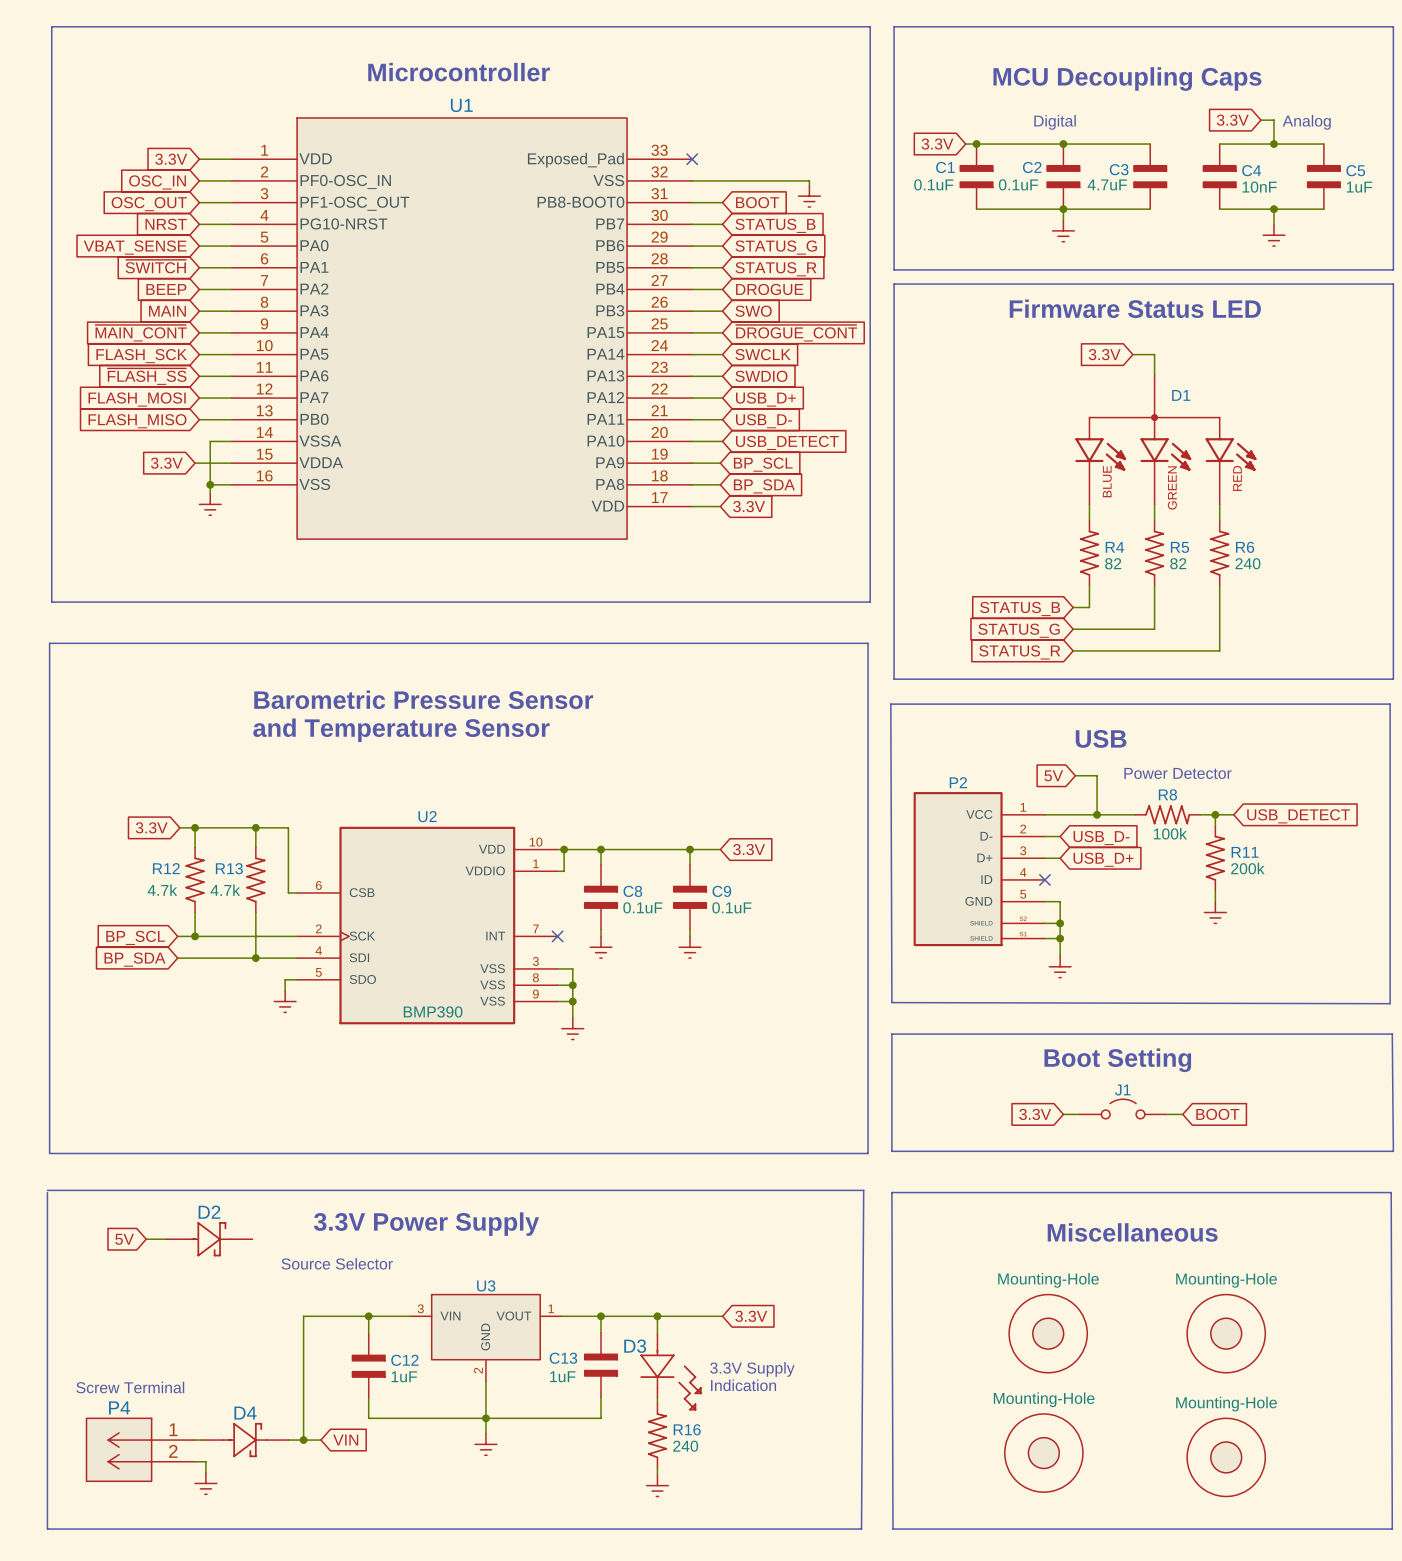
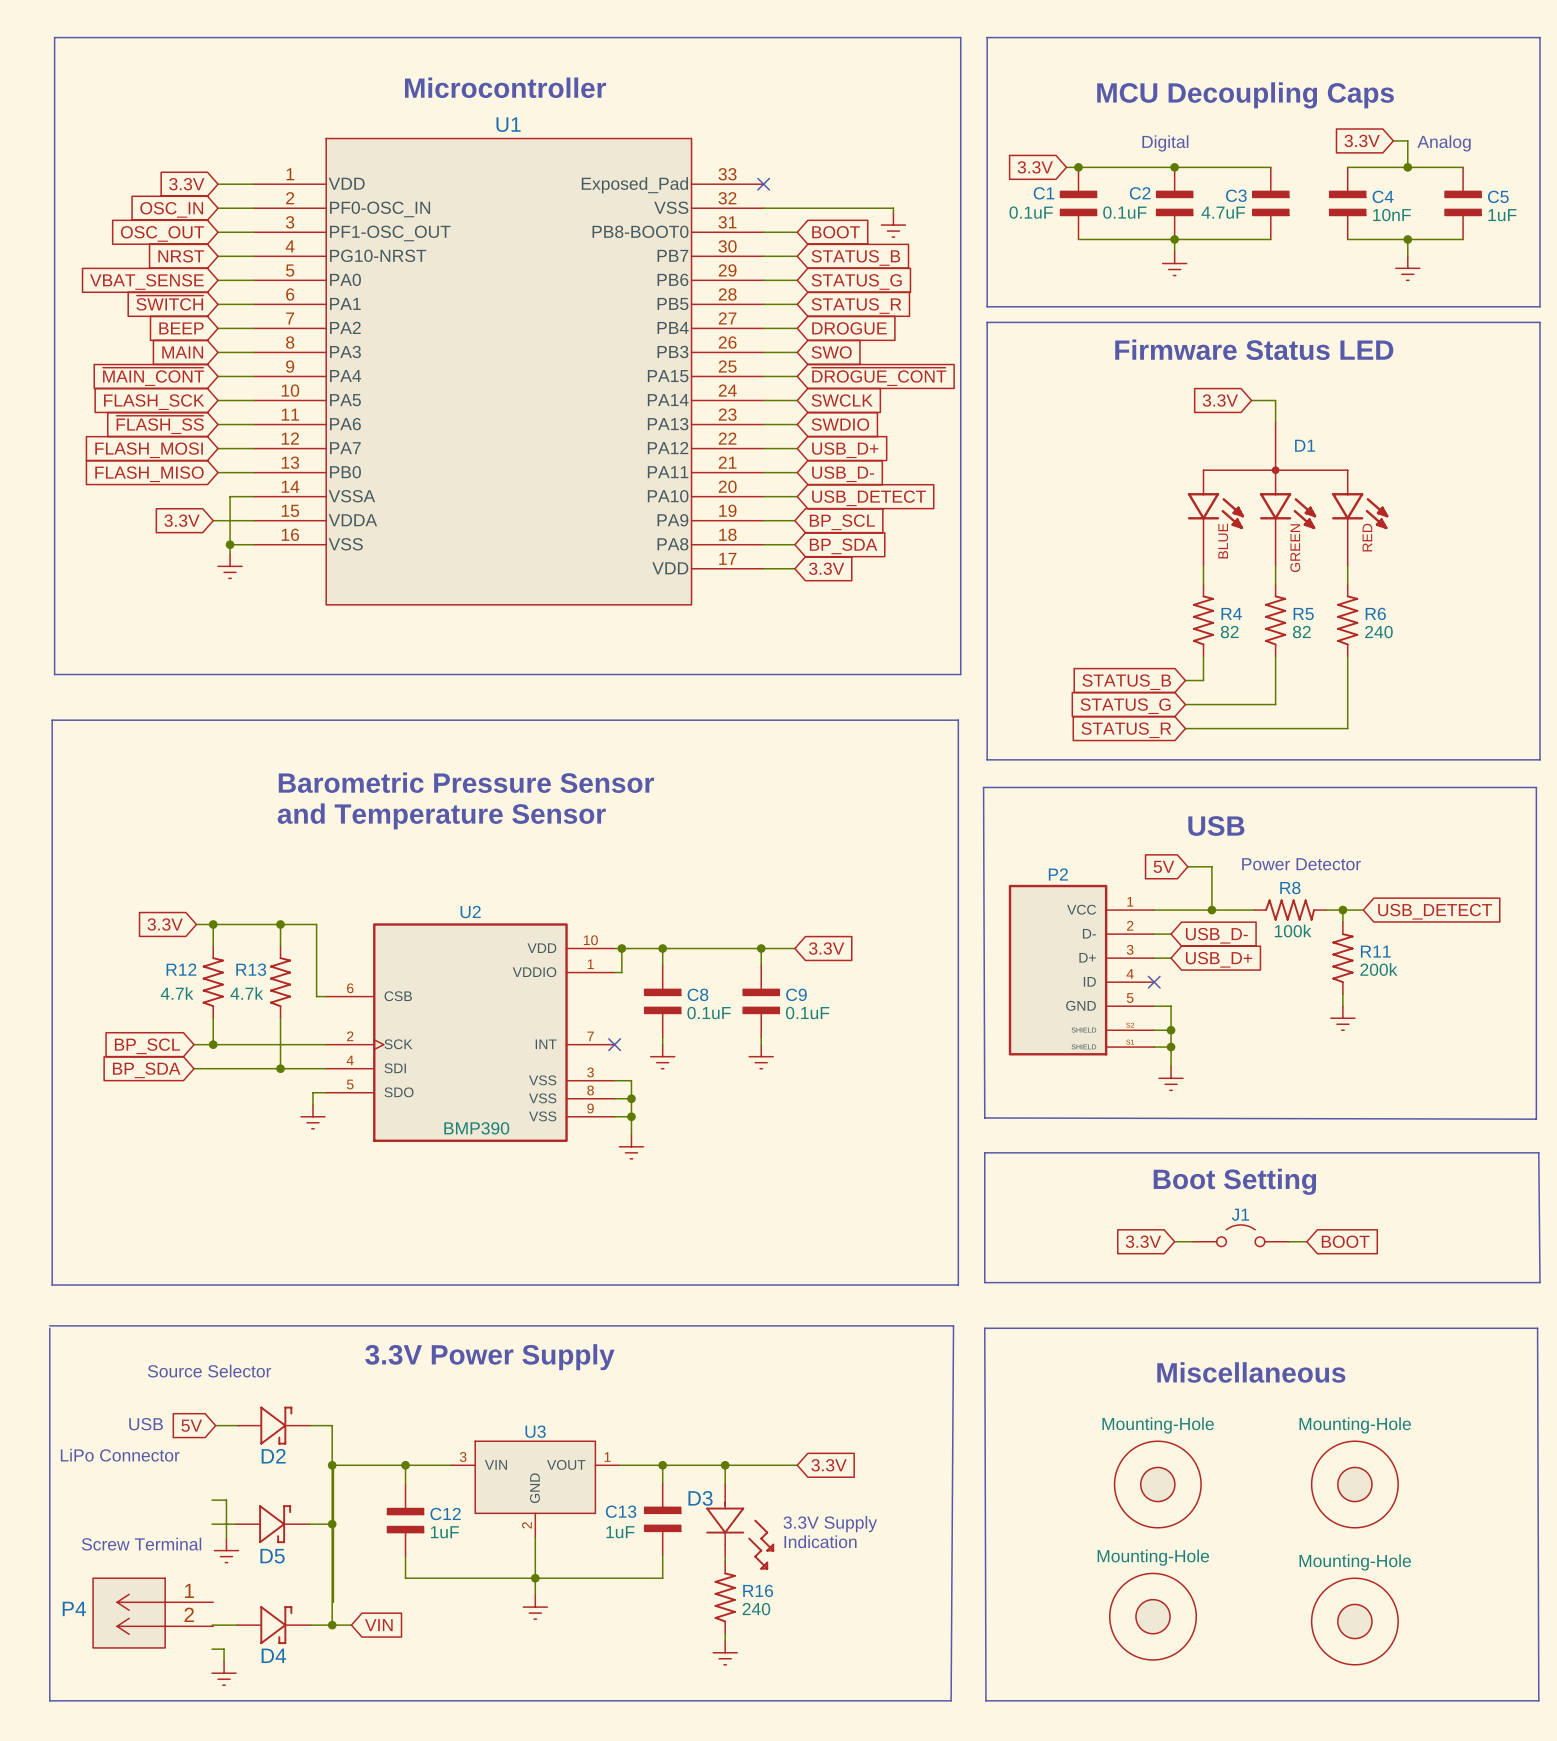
D2 name position: D2 (209, 1212) -> D2 (273, 1456)
D2 symbol: [165, 1222, 253, 1257] -> [237, 1406, 311, 1445]
text position: 3.3V Power Supply (426, 1224) -> 3.3V Power Supply (489, 1357)
global label position: 5V (124, 1239) -> 5V (191, 1425)
wire: (146, 1239) (165, 1239) -> (215, 1425) (237, 1425)
text position: Source Selector (337, 1263) -> Source Selector (209, 1371)
text: none -> USB (146, 1424)
wire: none -> (310, 1425) (332, 1425) (332, 1625)
text: none -> LiPo Connector (120, 1455)
junction: none -> (332, 1465)
wire: none -> (212, 1500) (226, 1500) (226, 1538)
wire: none -> (212, 1524) (236, 1524)
D5: none -> (272, 1524)
wire: none -> (309, 1524) (332, 1524)
junction: none -> (332, 1524)
power symbol: none -> (226, 1550)
P4 name position: P4 (119, 1407) -> P4 (74, 1608)
D4 name position: D4 (245, 1413) -> D4 (273, 1655)
D4 symbol: [201, 1422, 289, 1458] -> [237, 1606, 311, 1645]
wire: (195, 1440) (201, 1440) -> none
wire: (288, 1440) (320, 1440) -> none
junction position: (303, 1440) -> (332, 1625)
global label position: VIN (345, 1440) -> VIN (378, 1625)
wire: none -> (212, 1625) (237, 1625)
wire: none -> (310, 1625) (351, 1625)
wire: (195, 1461) (205, 1461) (205, 1472) -> (212, 1649) (224, 1649) (224, 1661)
power symbol position: (205, 1483) -> (224, 1673)

